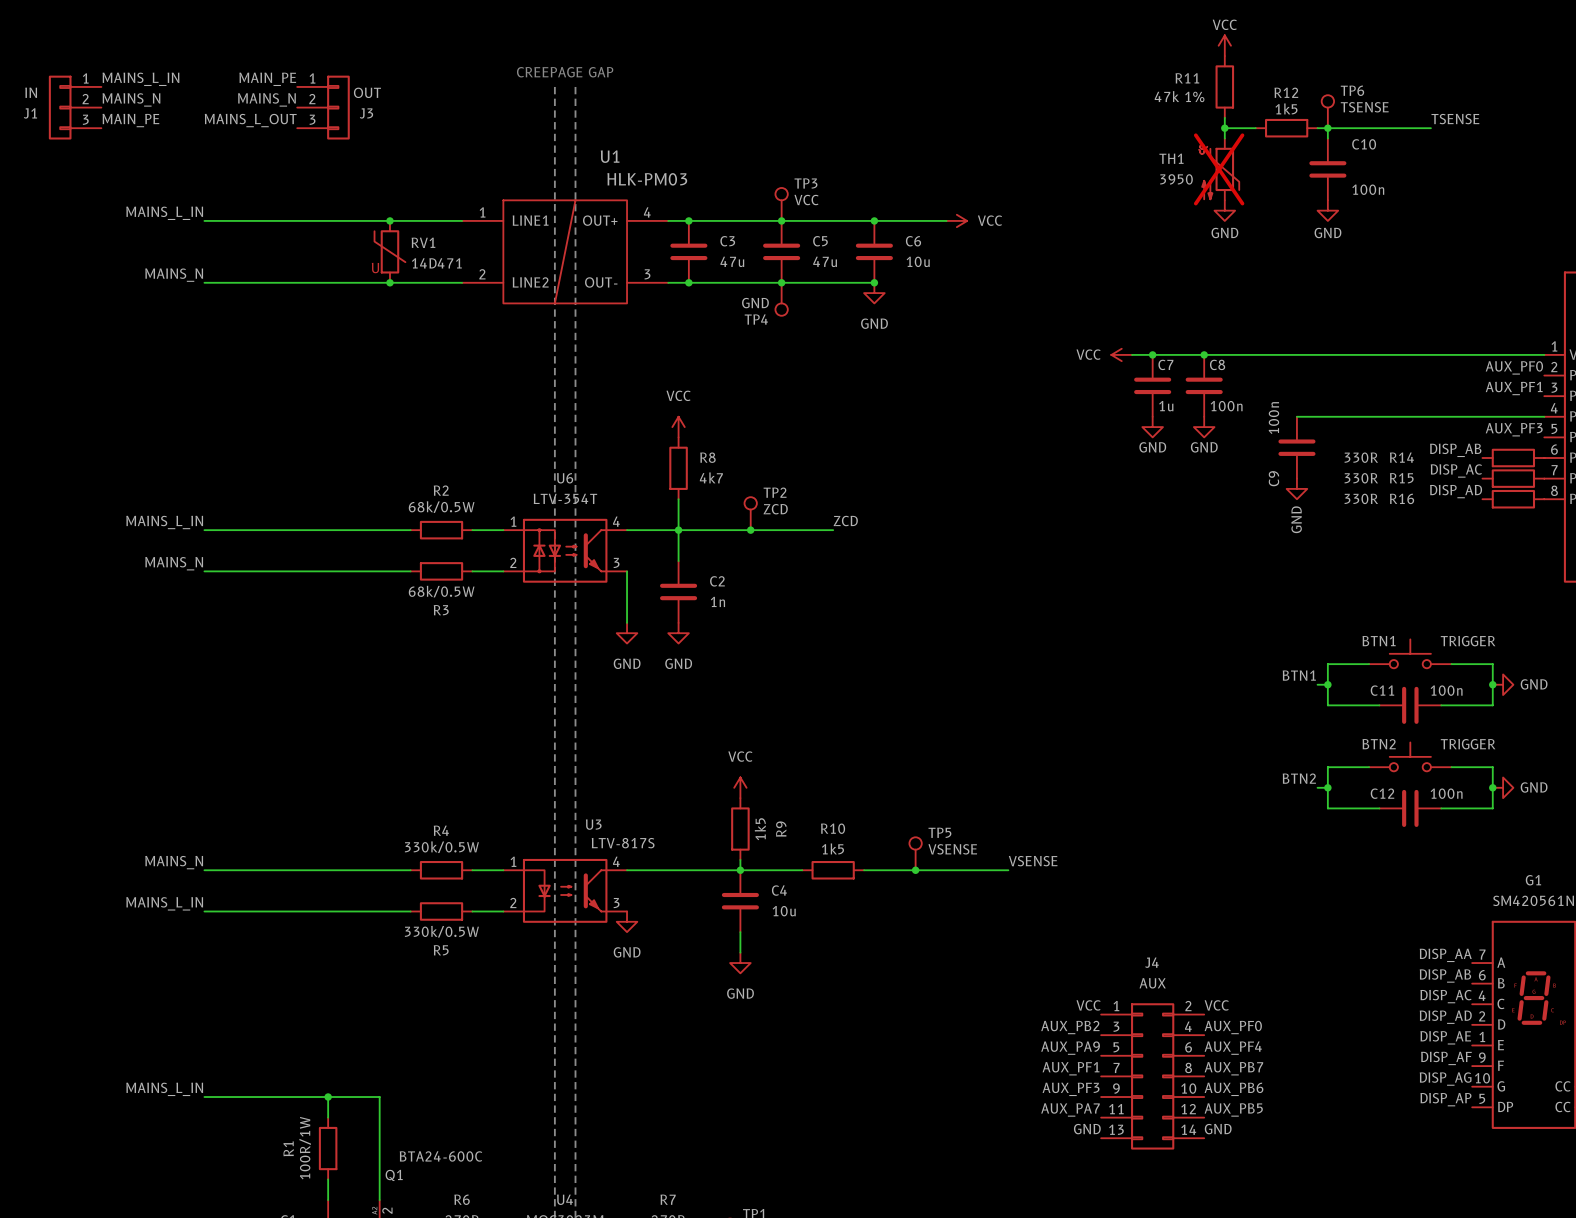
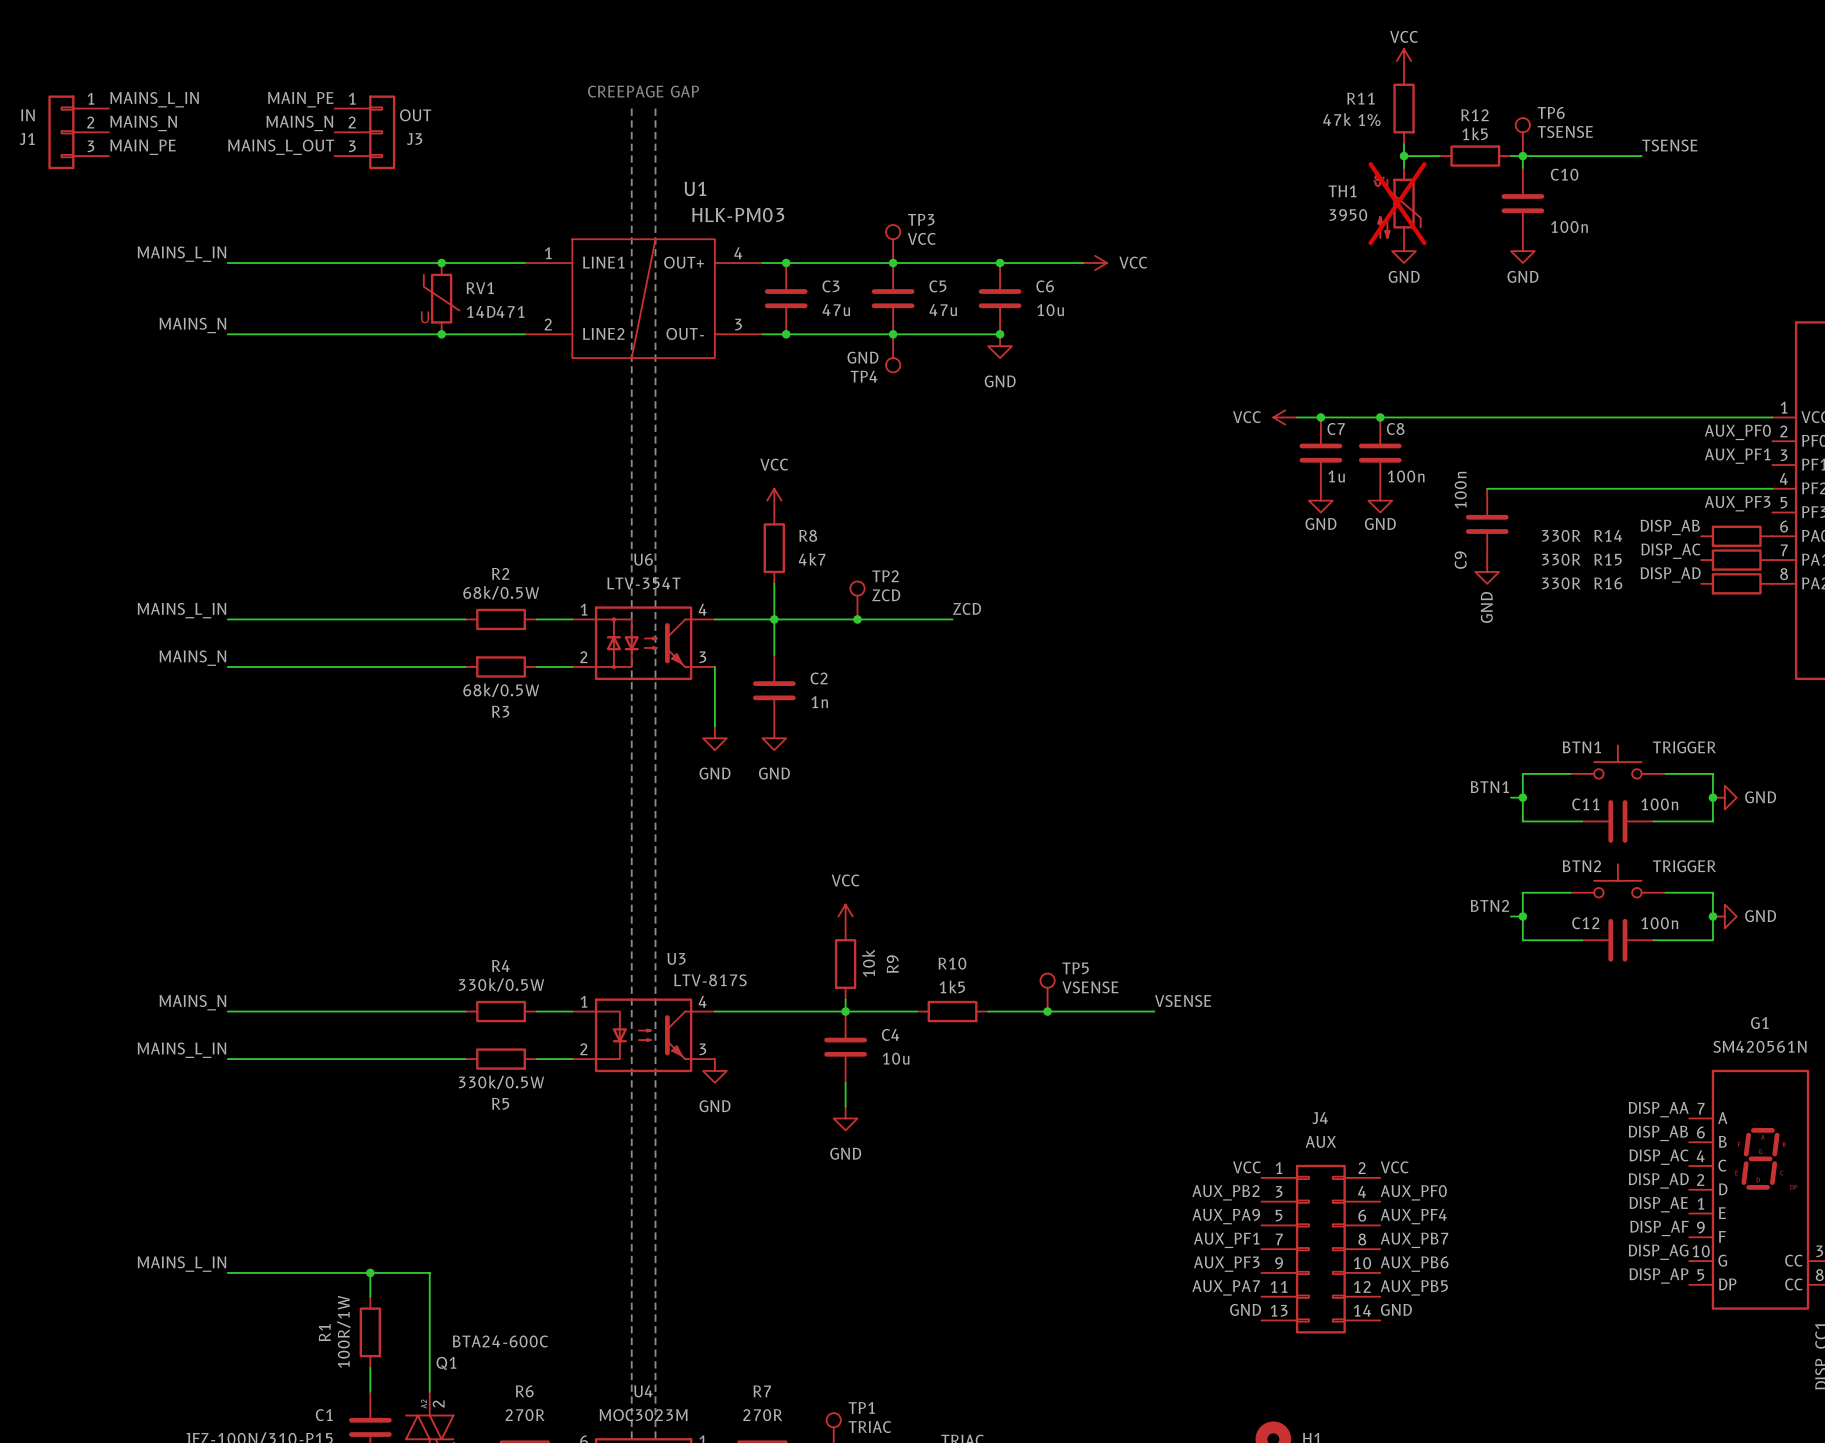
R9 value: 1k5 (760, 829) -> 10k (868, 963)

